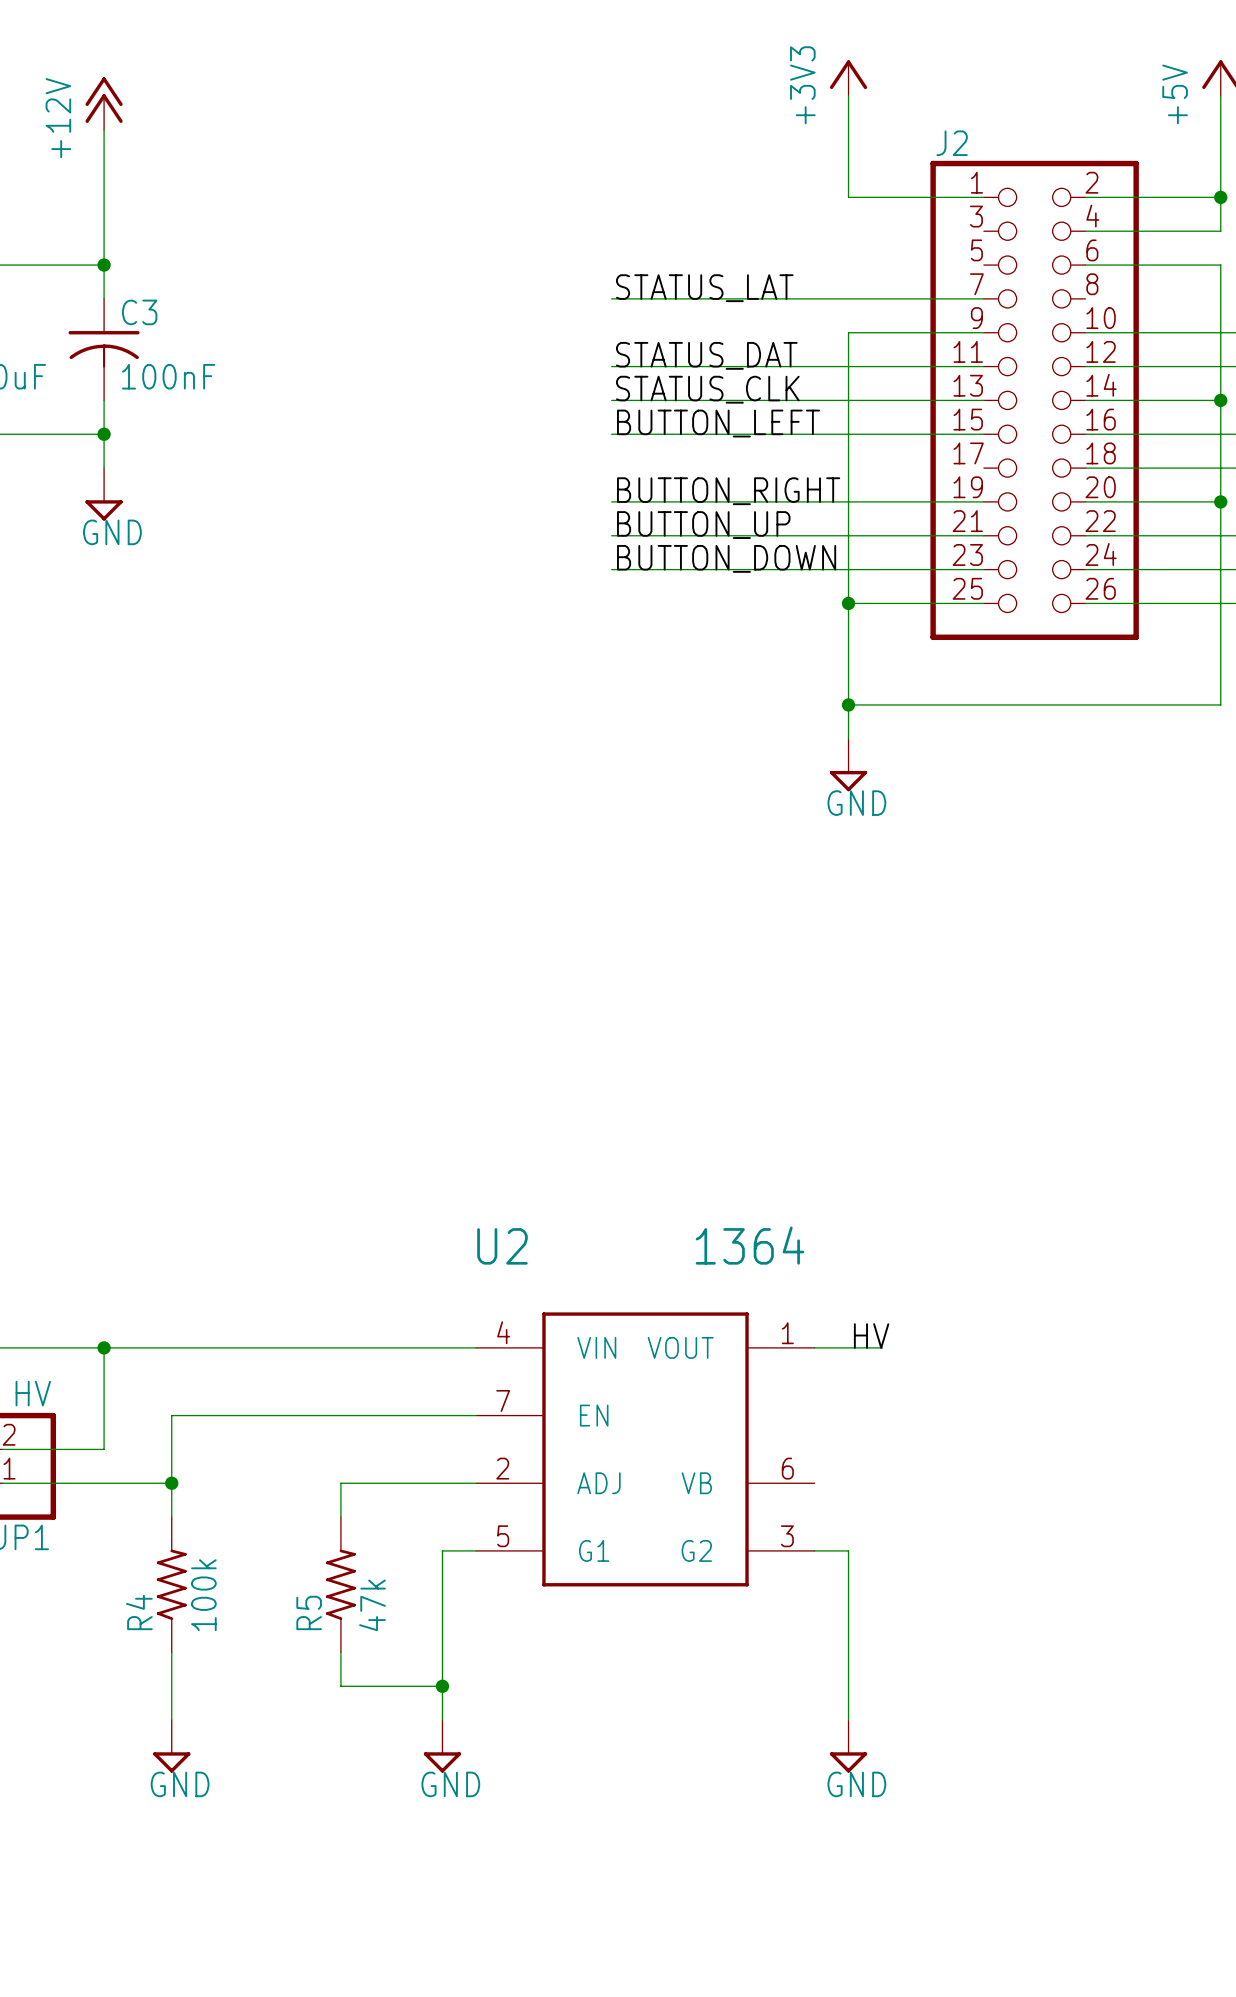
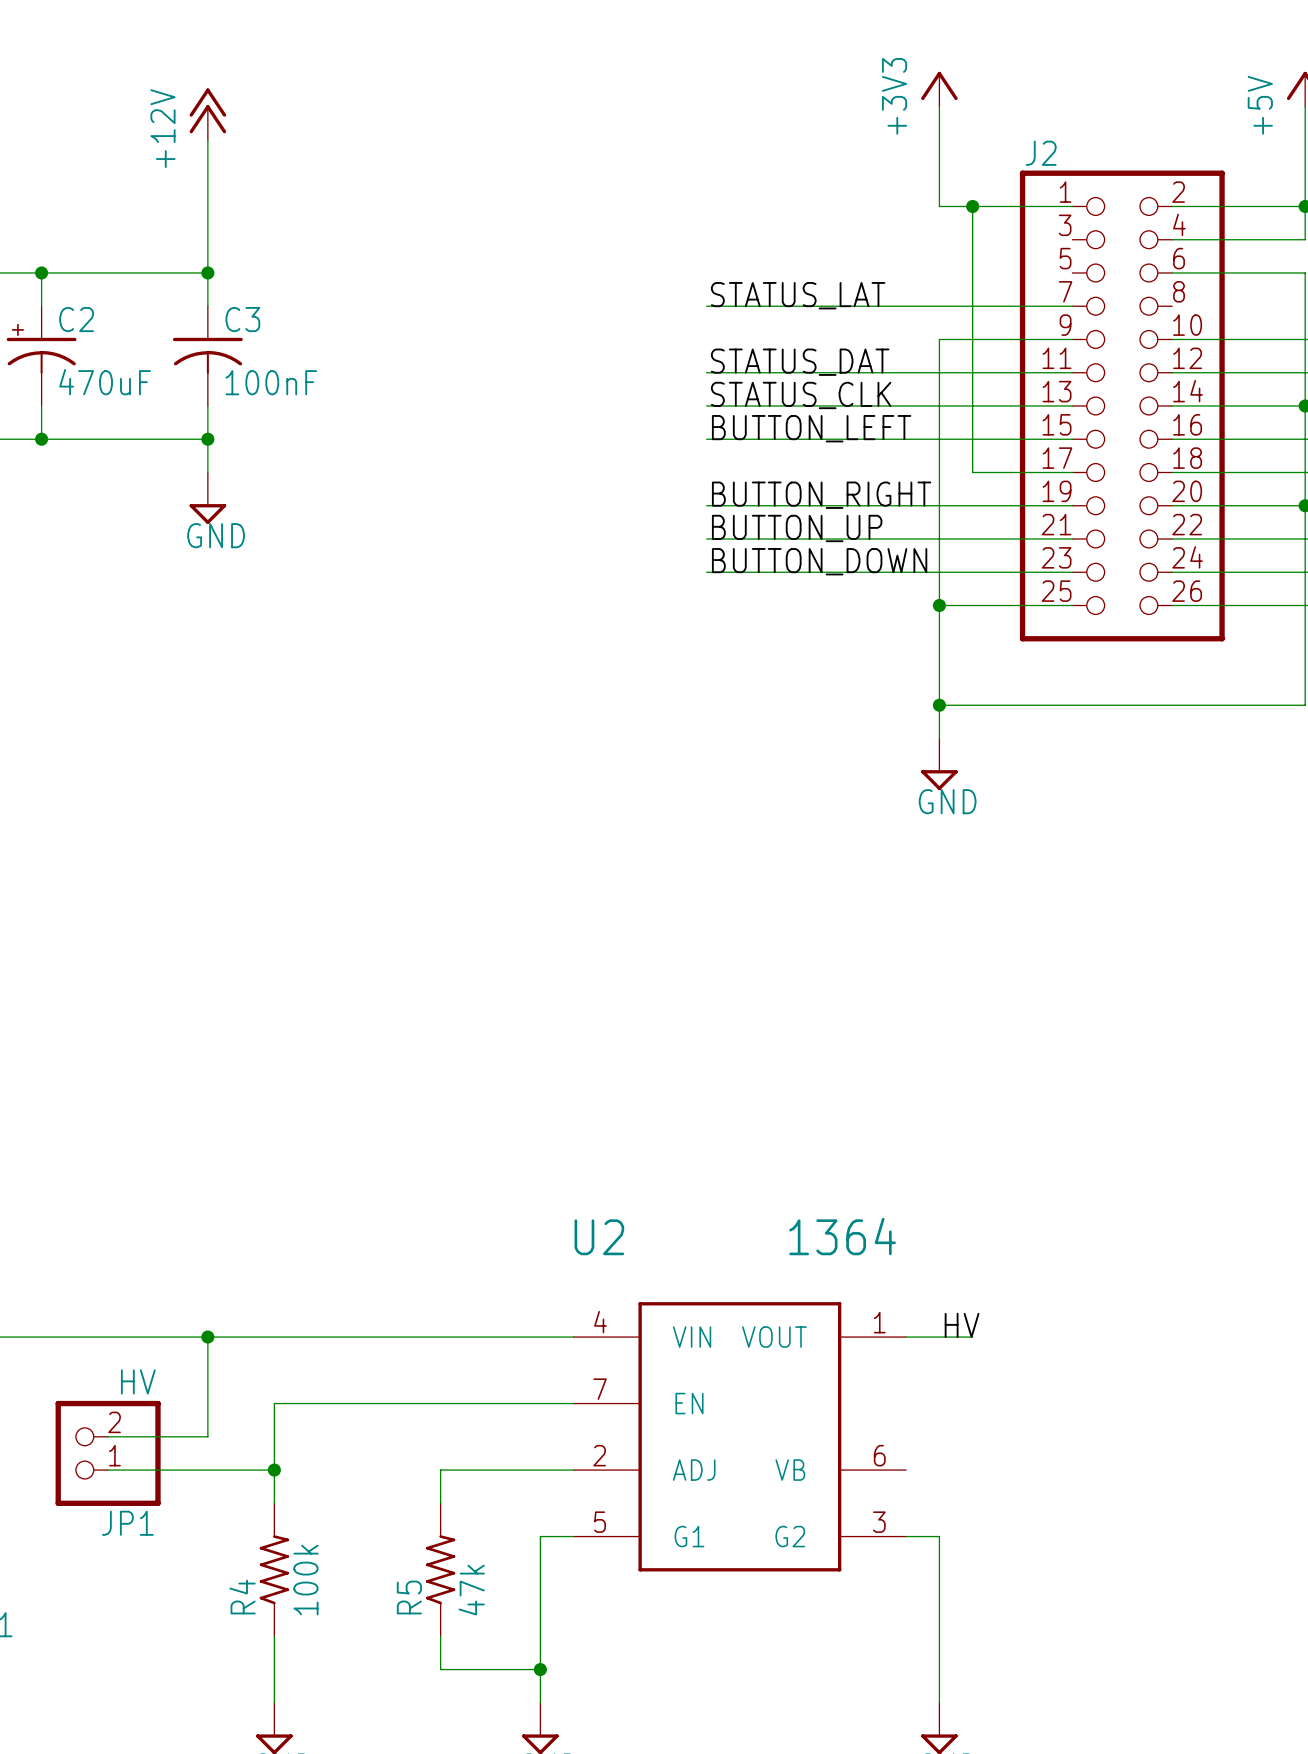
wire: none -> (972, 206) (972, 472) (1072, 472)
junction: none -> (972, 206)

